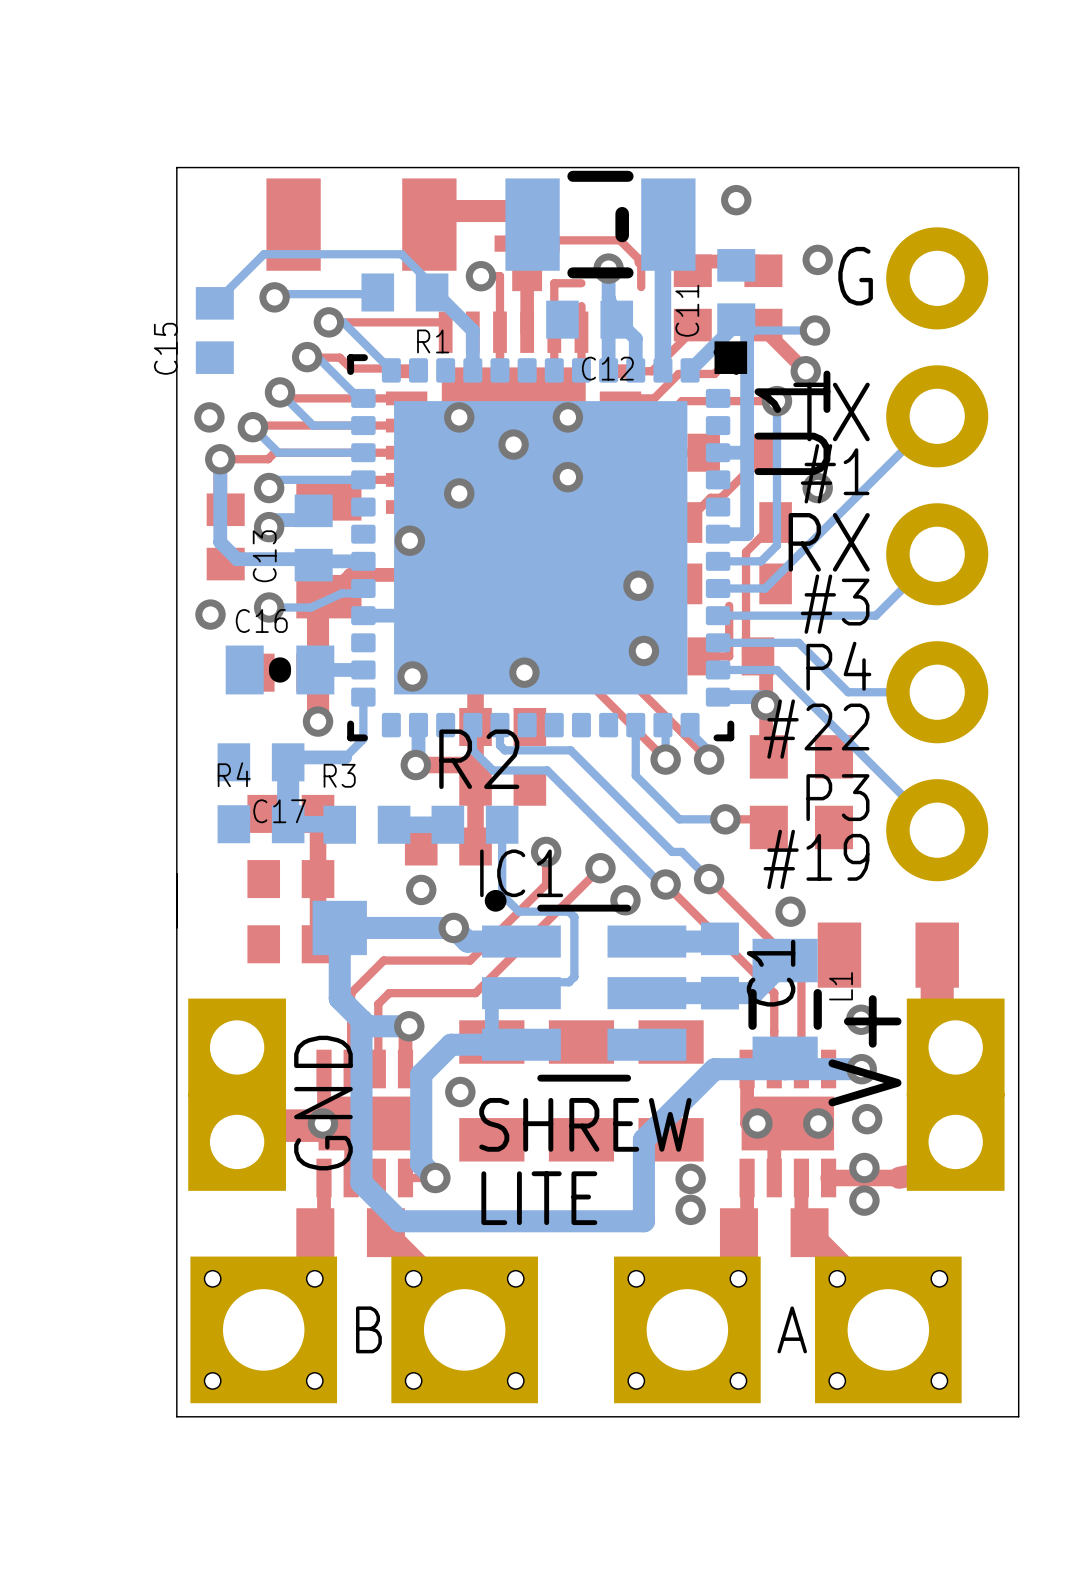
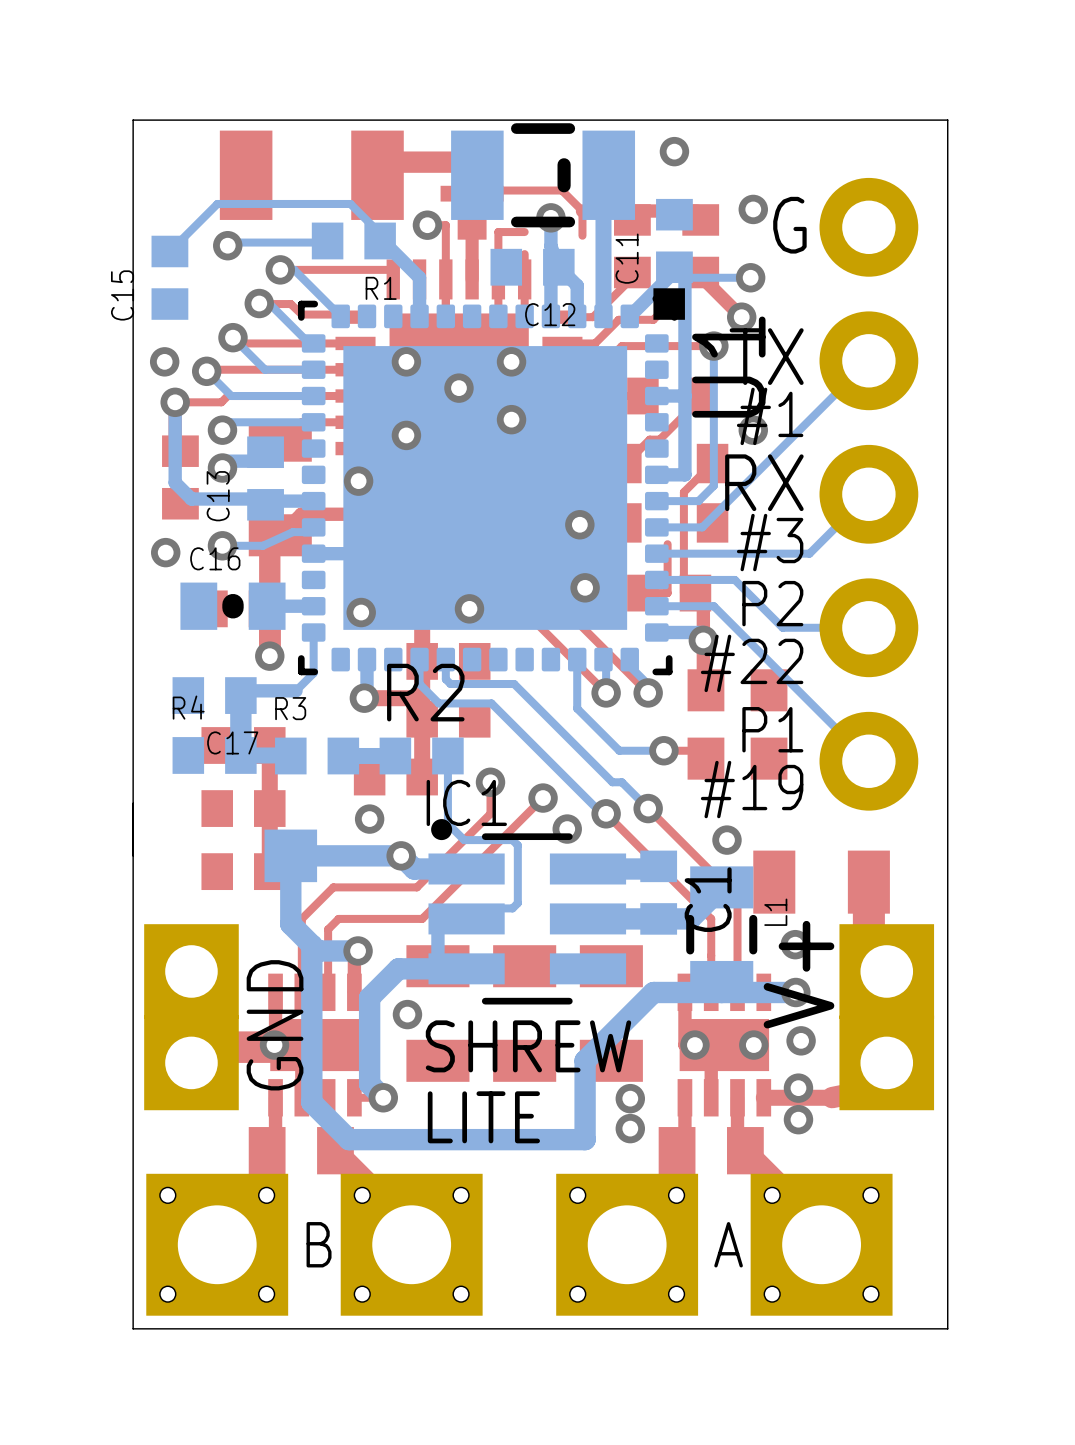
text: P4 (838, 666) -> P2 (772, 603)
text: P3 (837, 797) -> P1 (772, 729)

